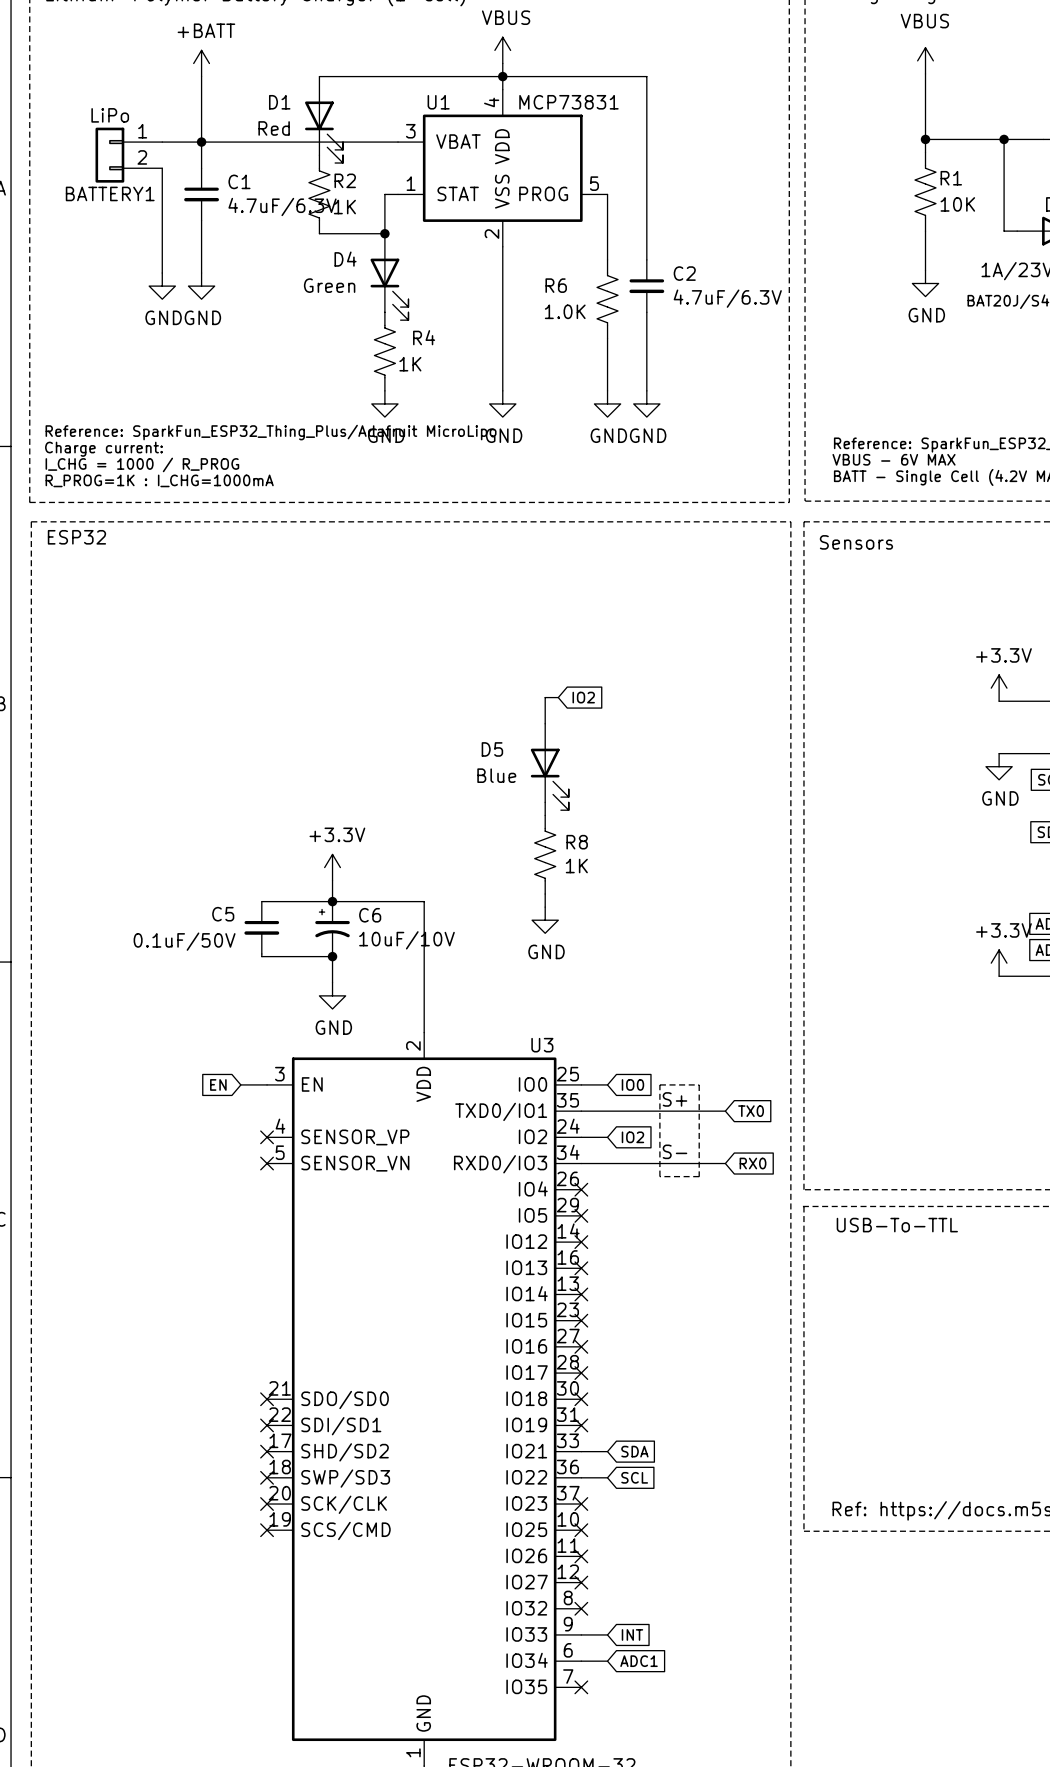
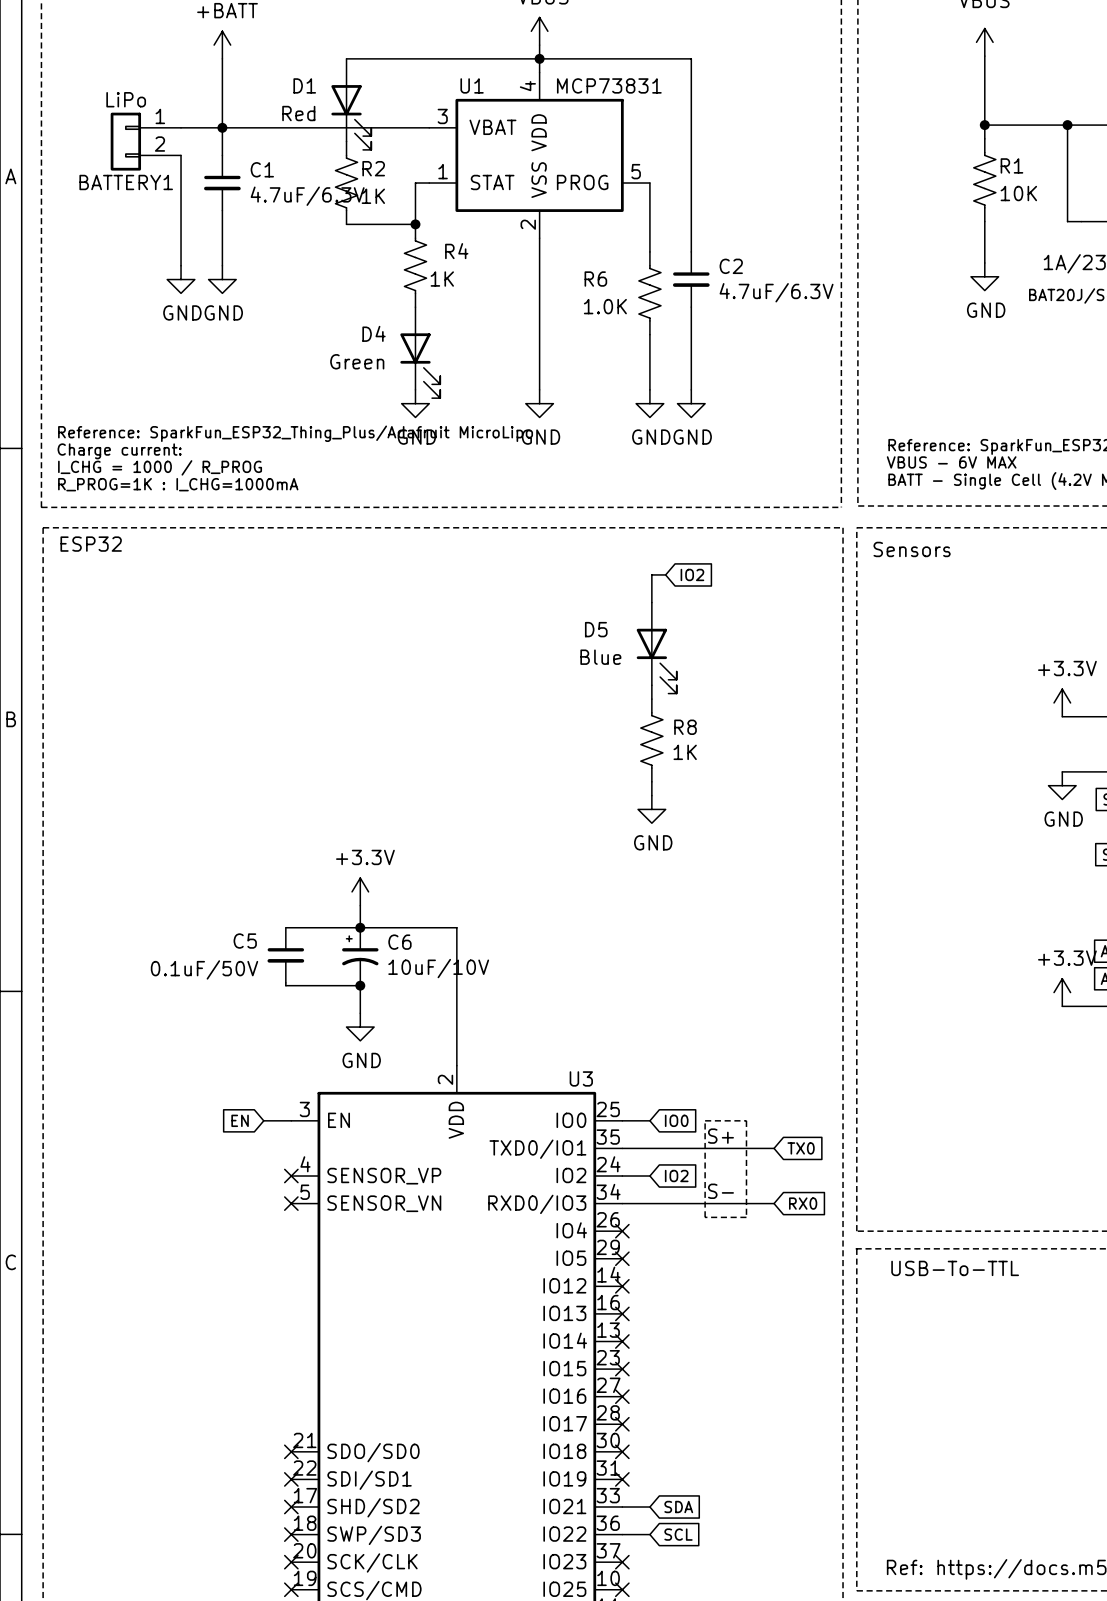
D4 position: (389, 276) -> (420, 352)
R4 position: (384, 351) -> (415, 265)
wire: (558, 697) (545, 697) (545, 723) -> (665, 574) (651, 574) (651, 602)
global label position: IO2 (583, 697) -> IO2 (692, 574)
D5 position: (549, 766) -> (656, 648)
wire: (545, 802) (545, 815) -> (651, 781) (651, 795)
R8 position: (545, 854) -> (651, 740)
wire: (545, 894) (545, 907) -> (651, 685) (651, 699)
power symbol position: GND (545, 920) -> GND (651, 809)

